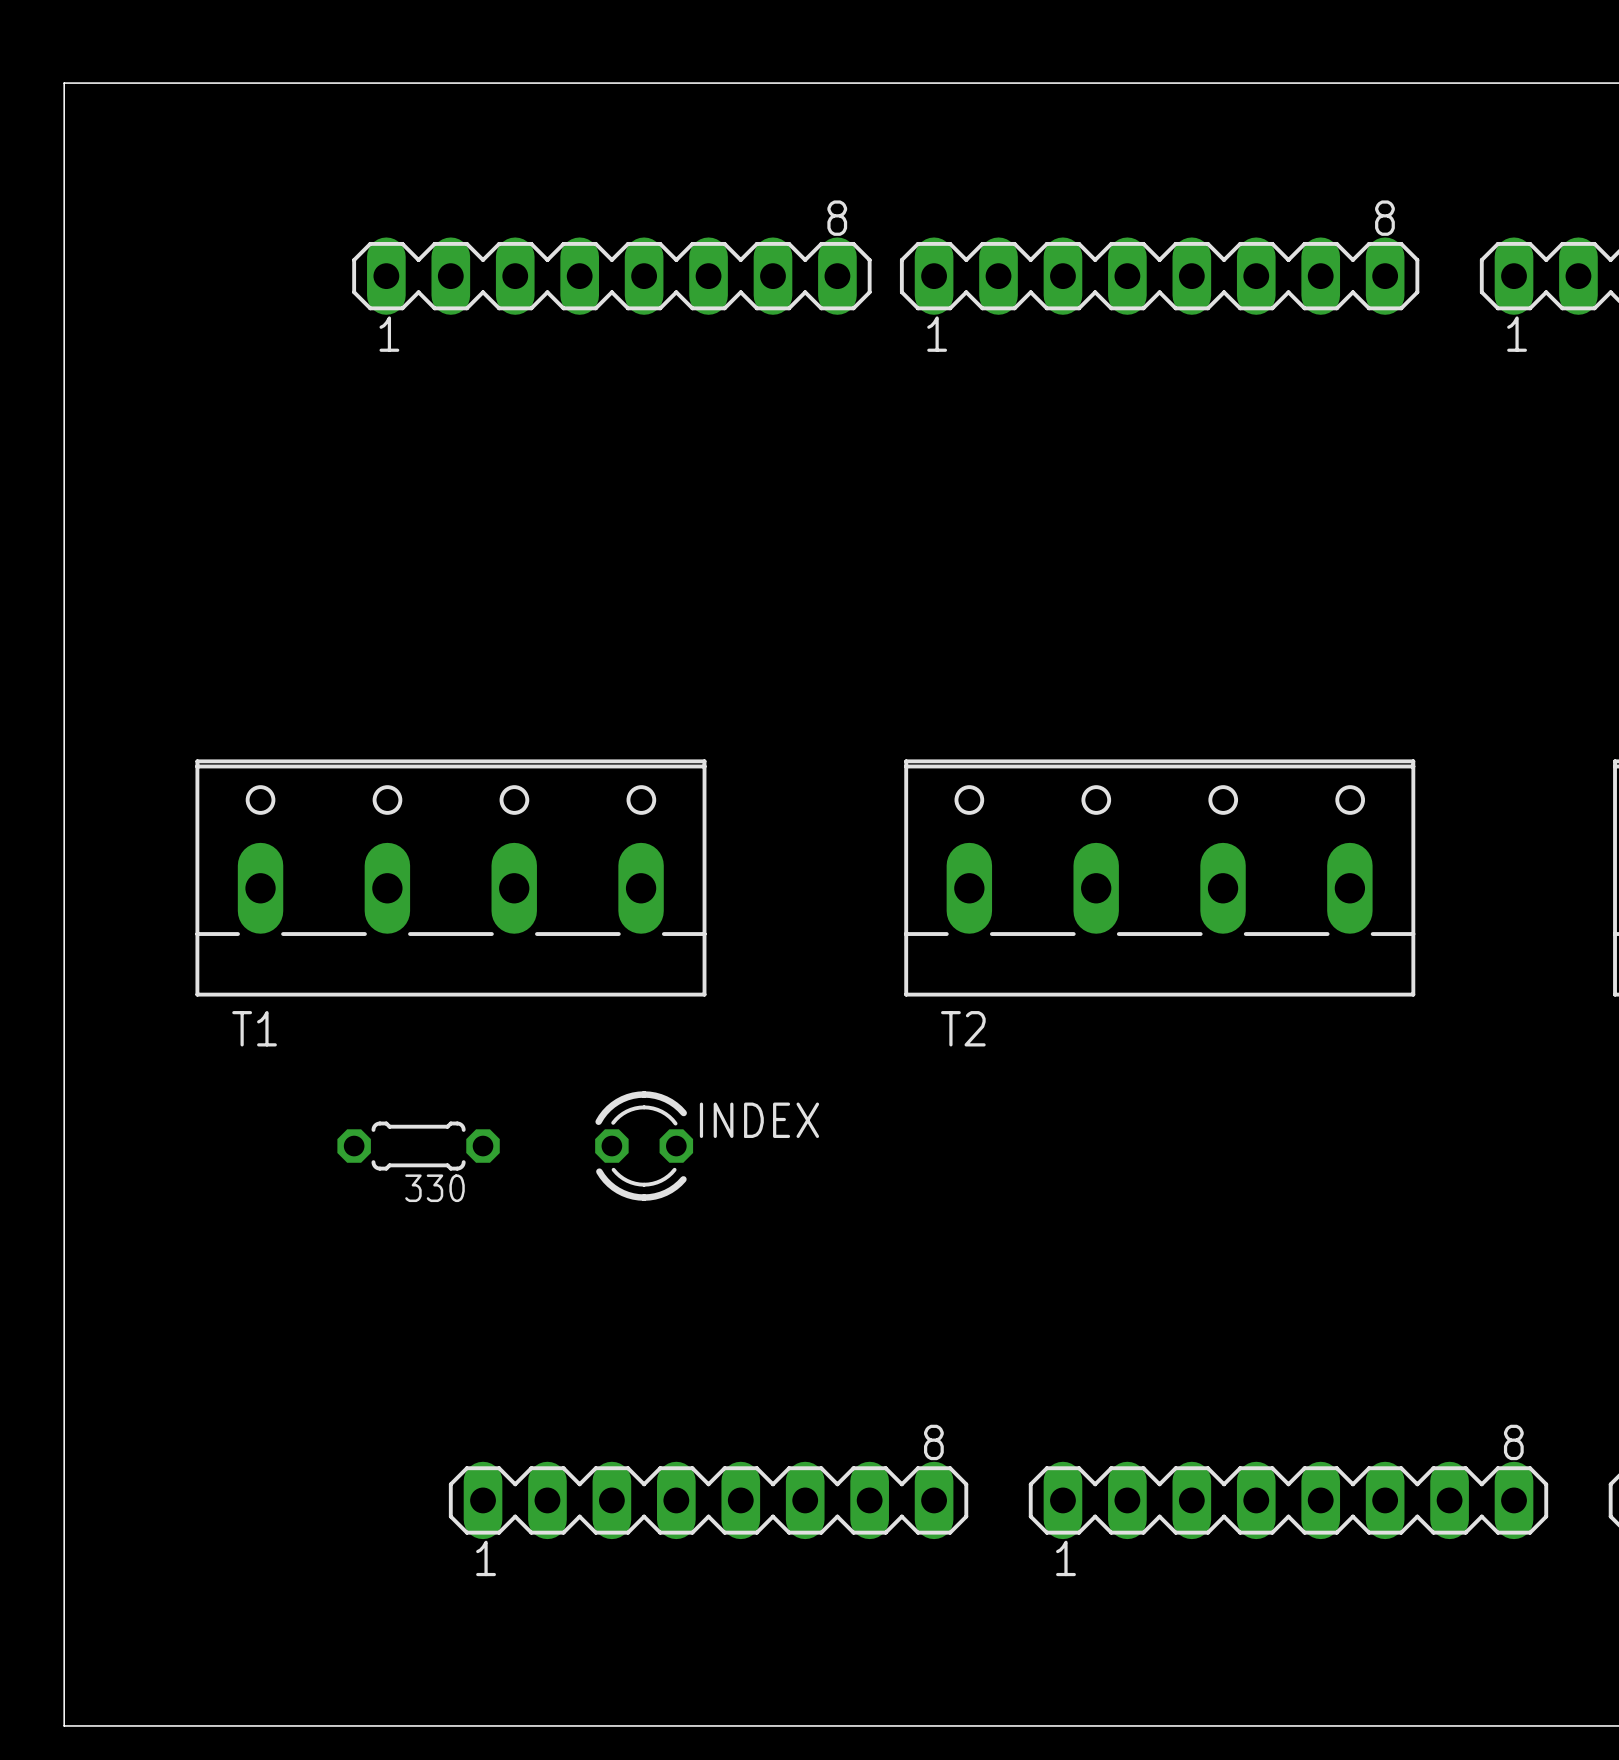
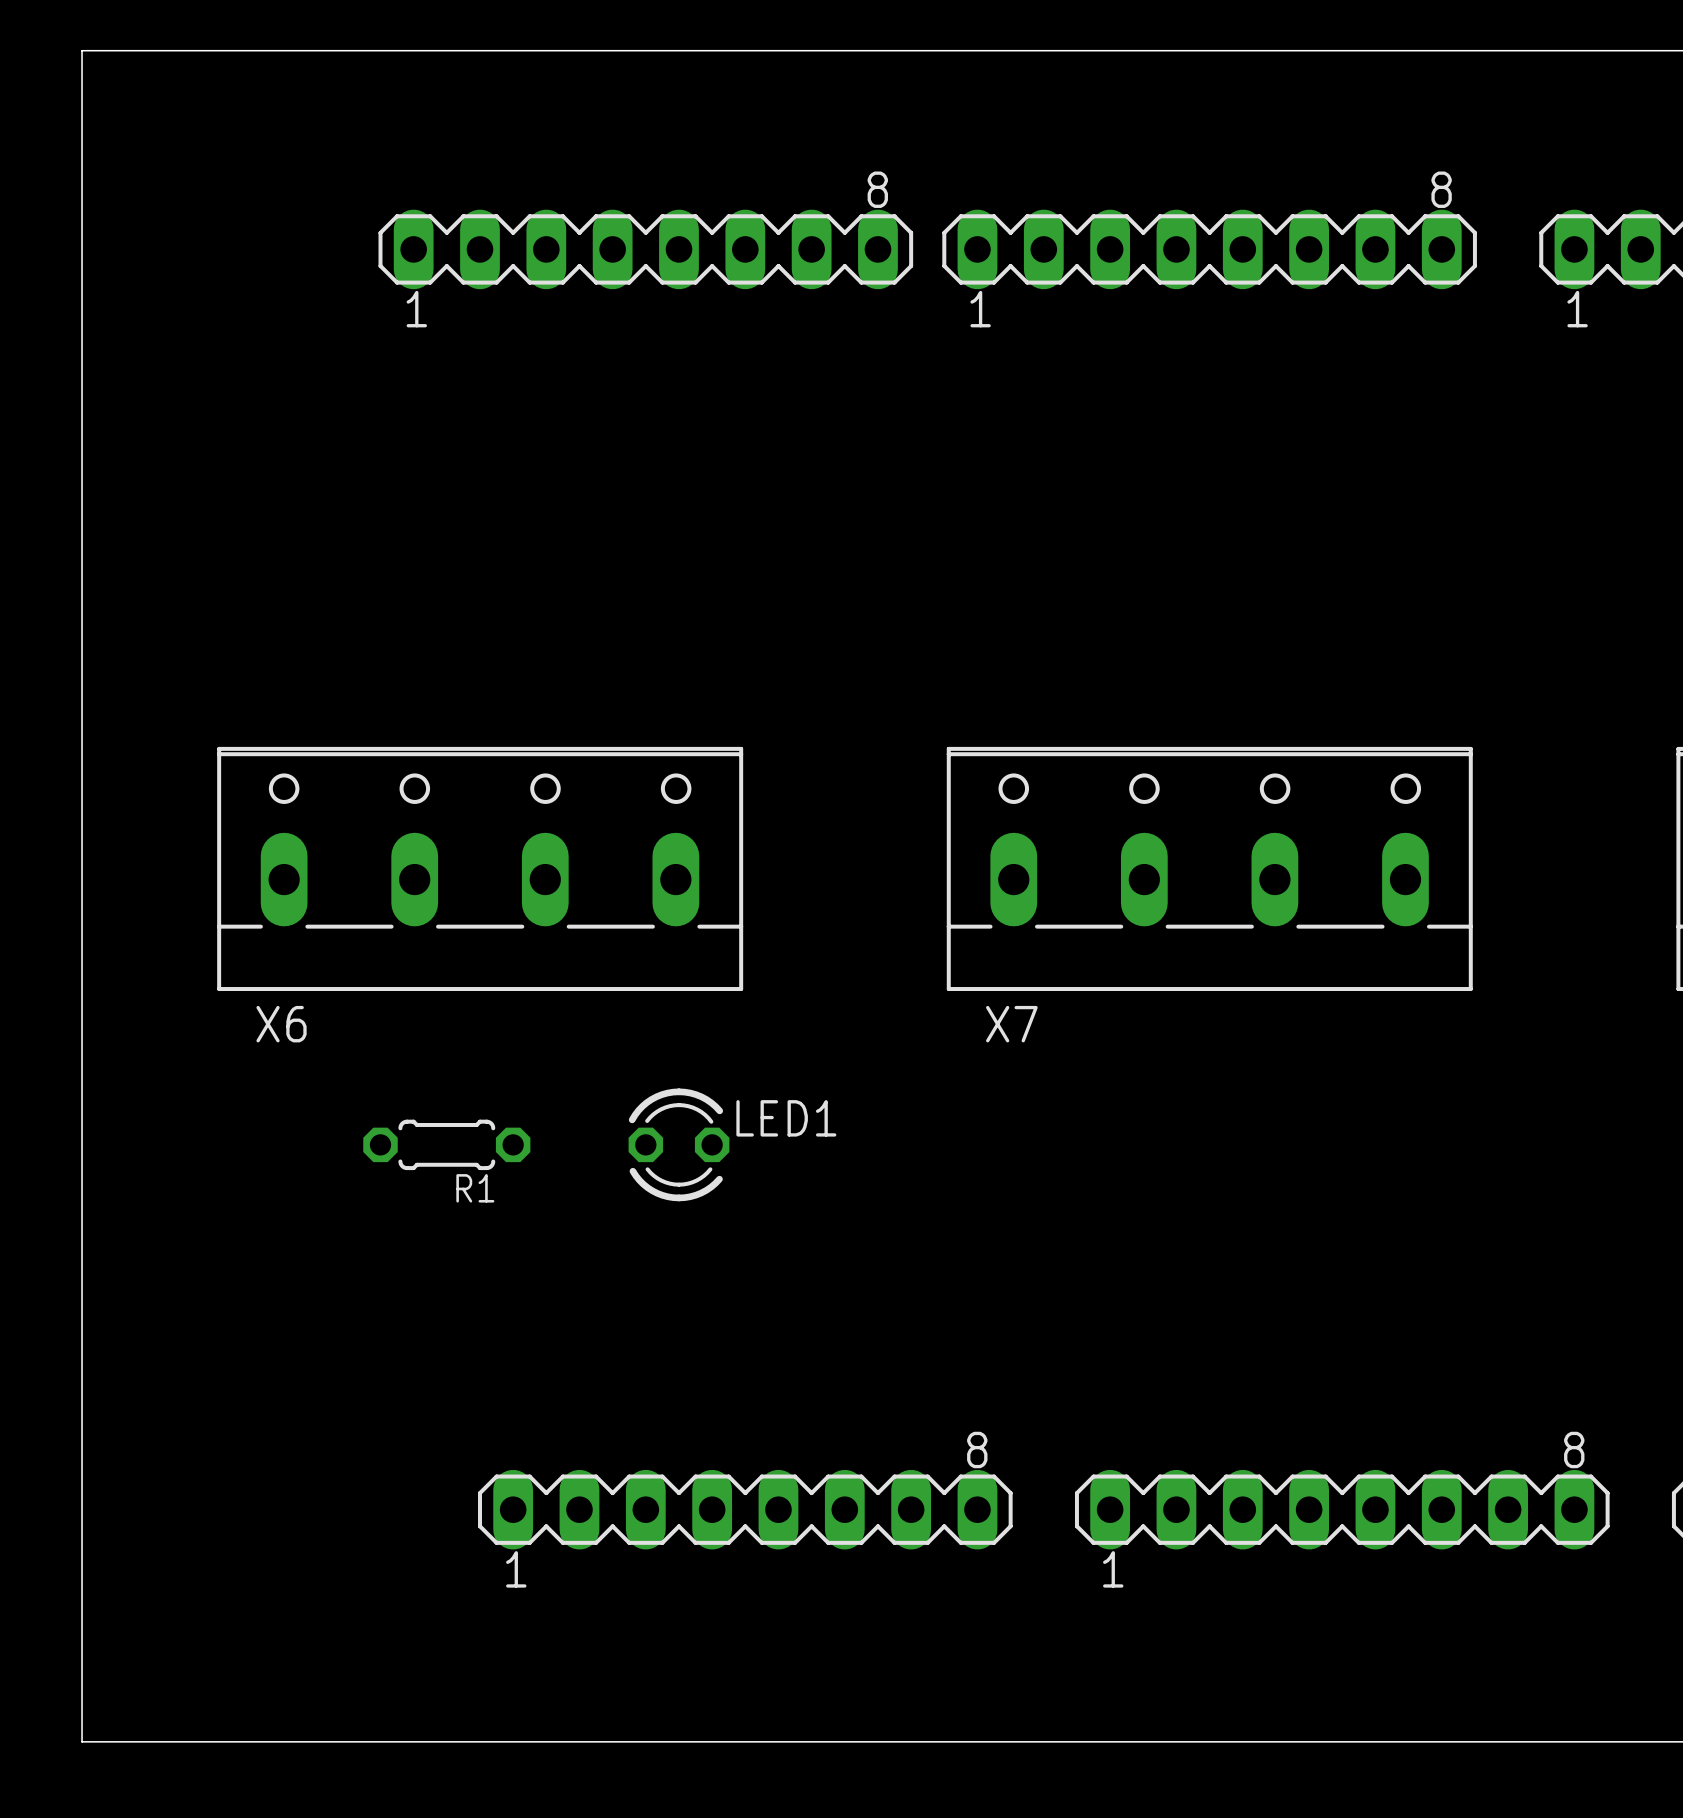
T1 name: T1 (254, 1028) -> X6 (281, 1024)
T2 name: T2 (963, 1028) -> X7 (1011, 1024)
INDEX name: INDEX (759, 1120) -> LED1 (786, 1118)
330 name: 330 (434, 1188) -> R1 (475, 1188)

